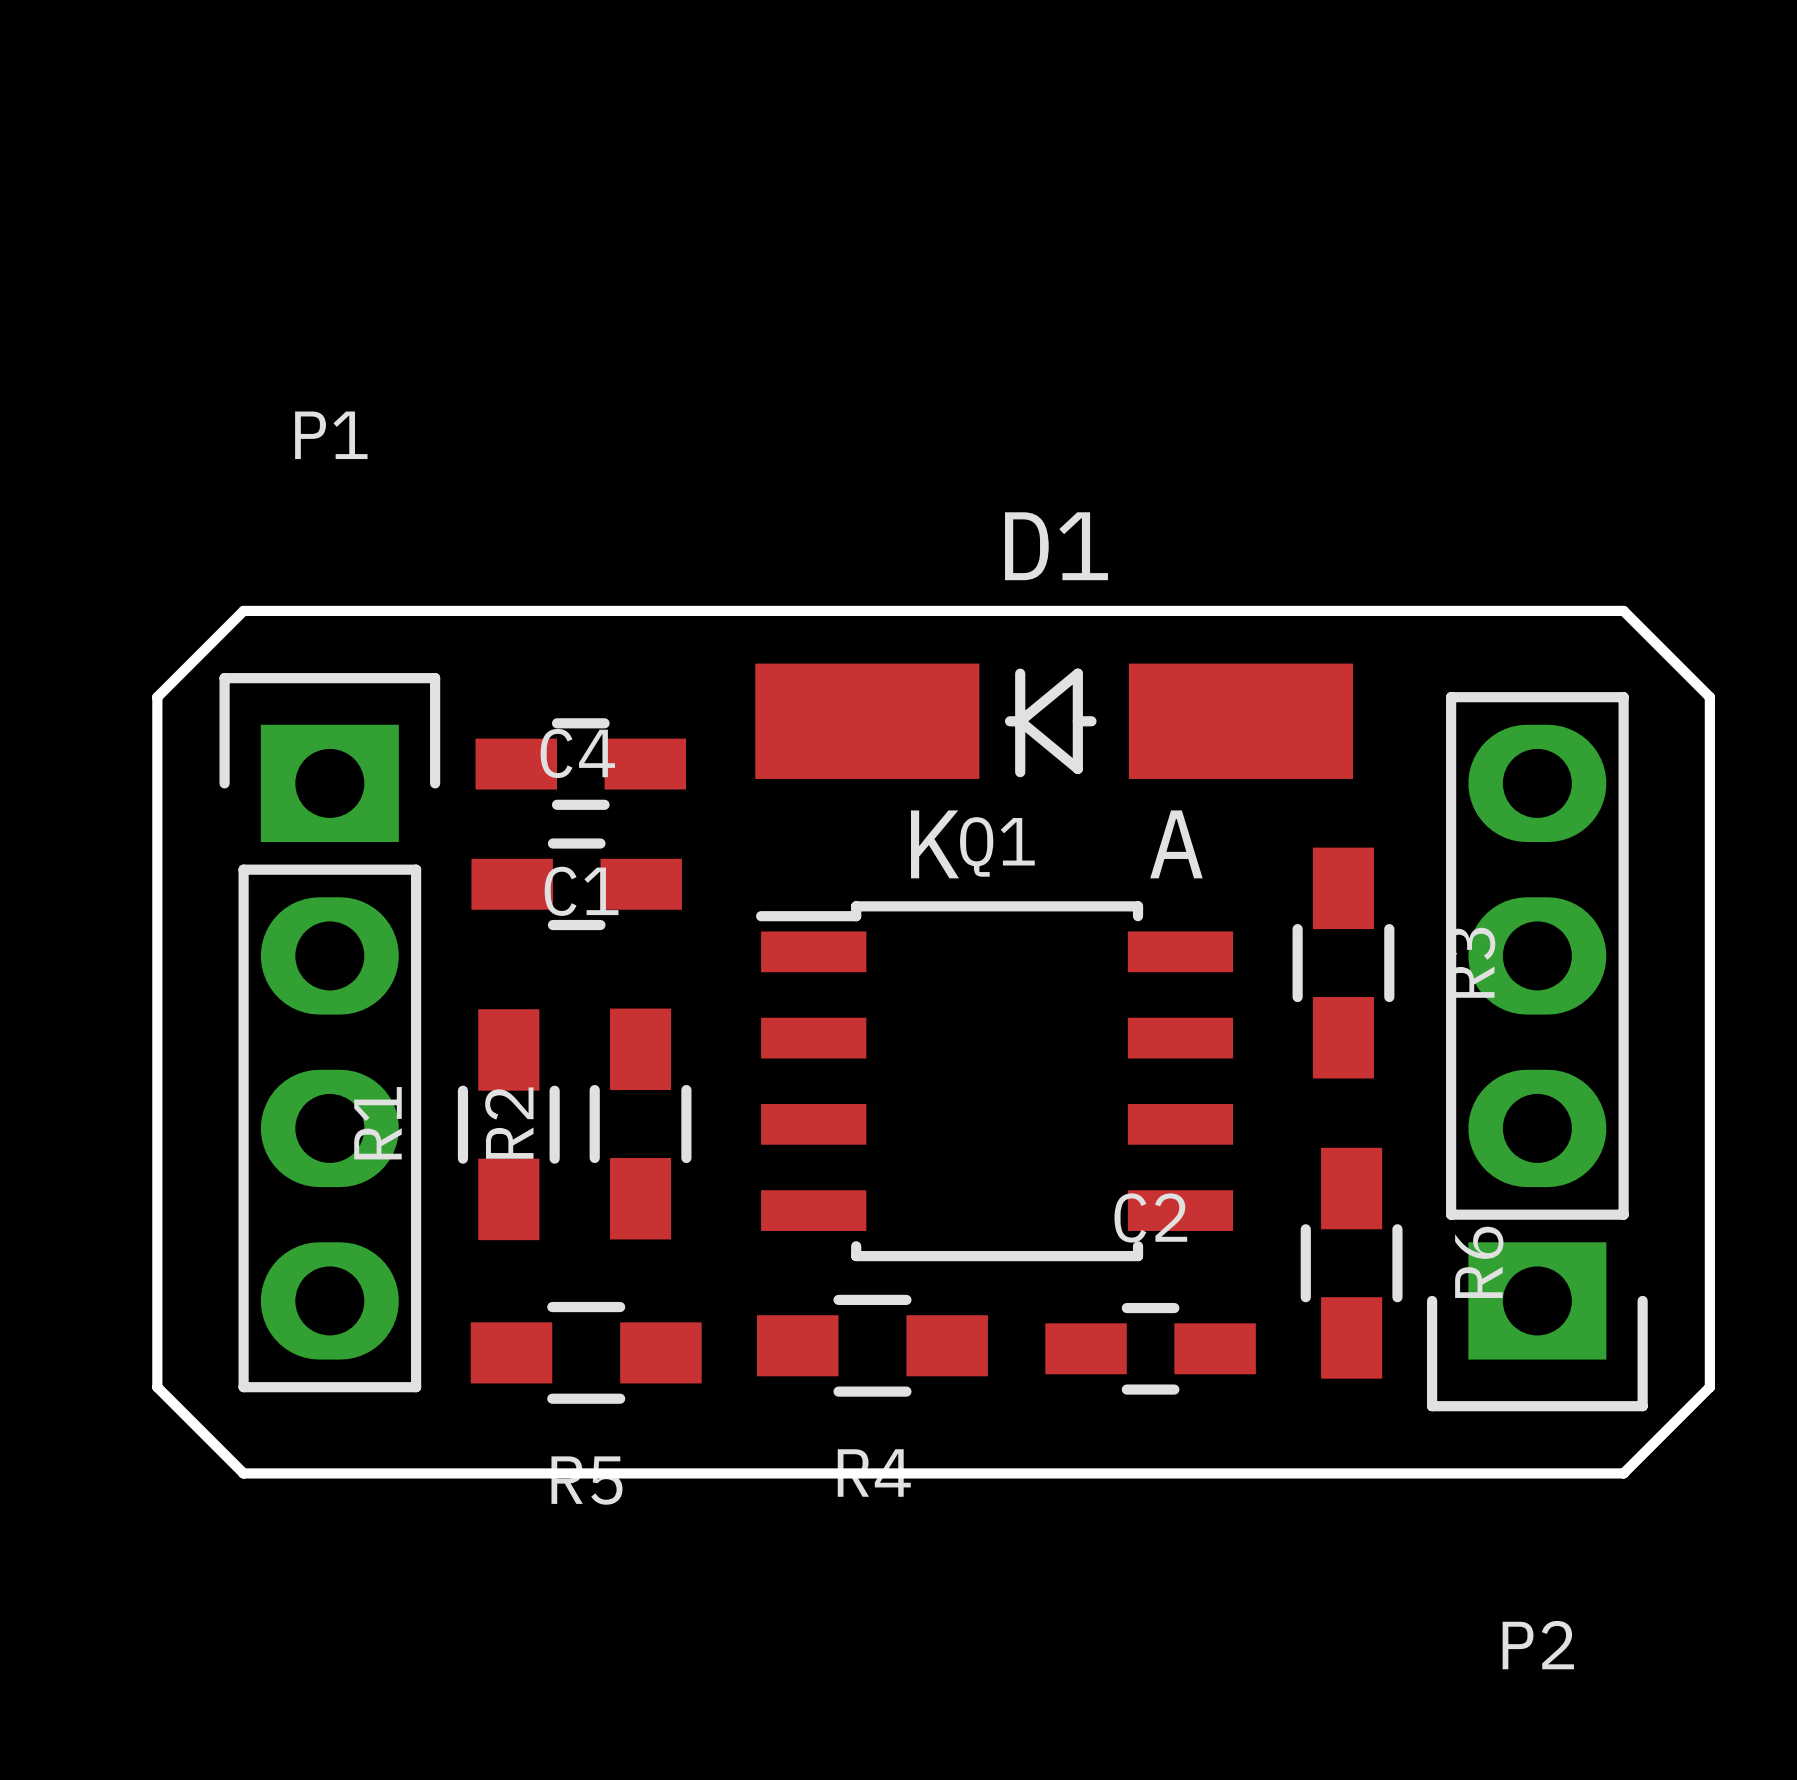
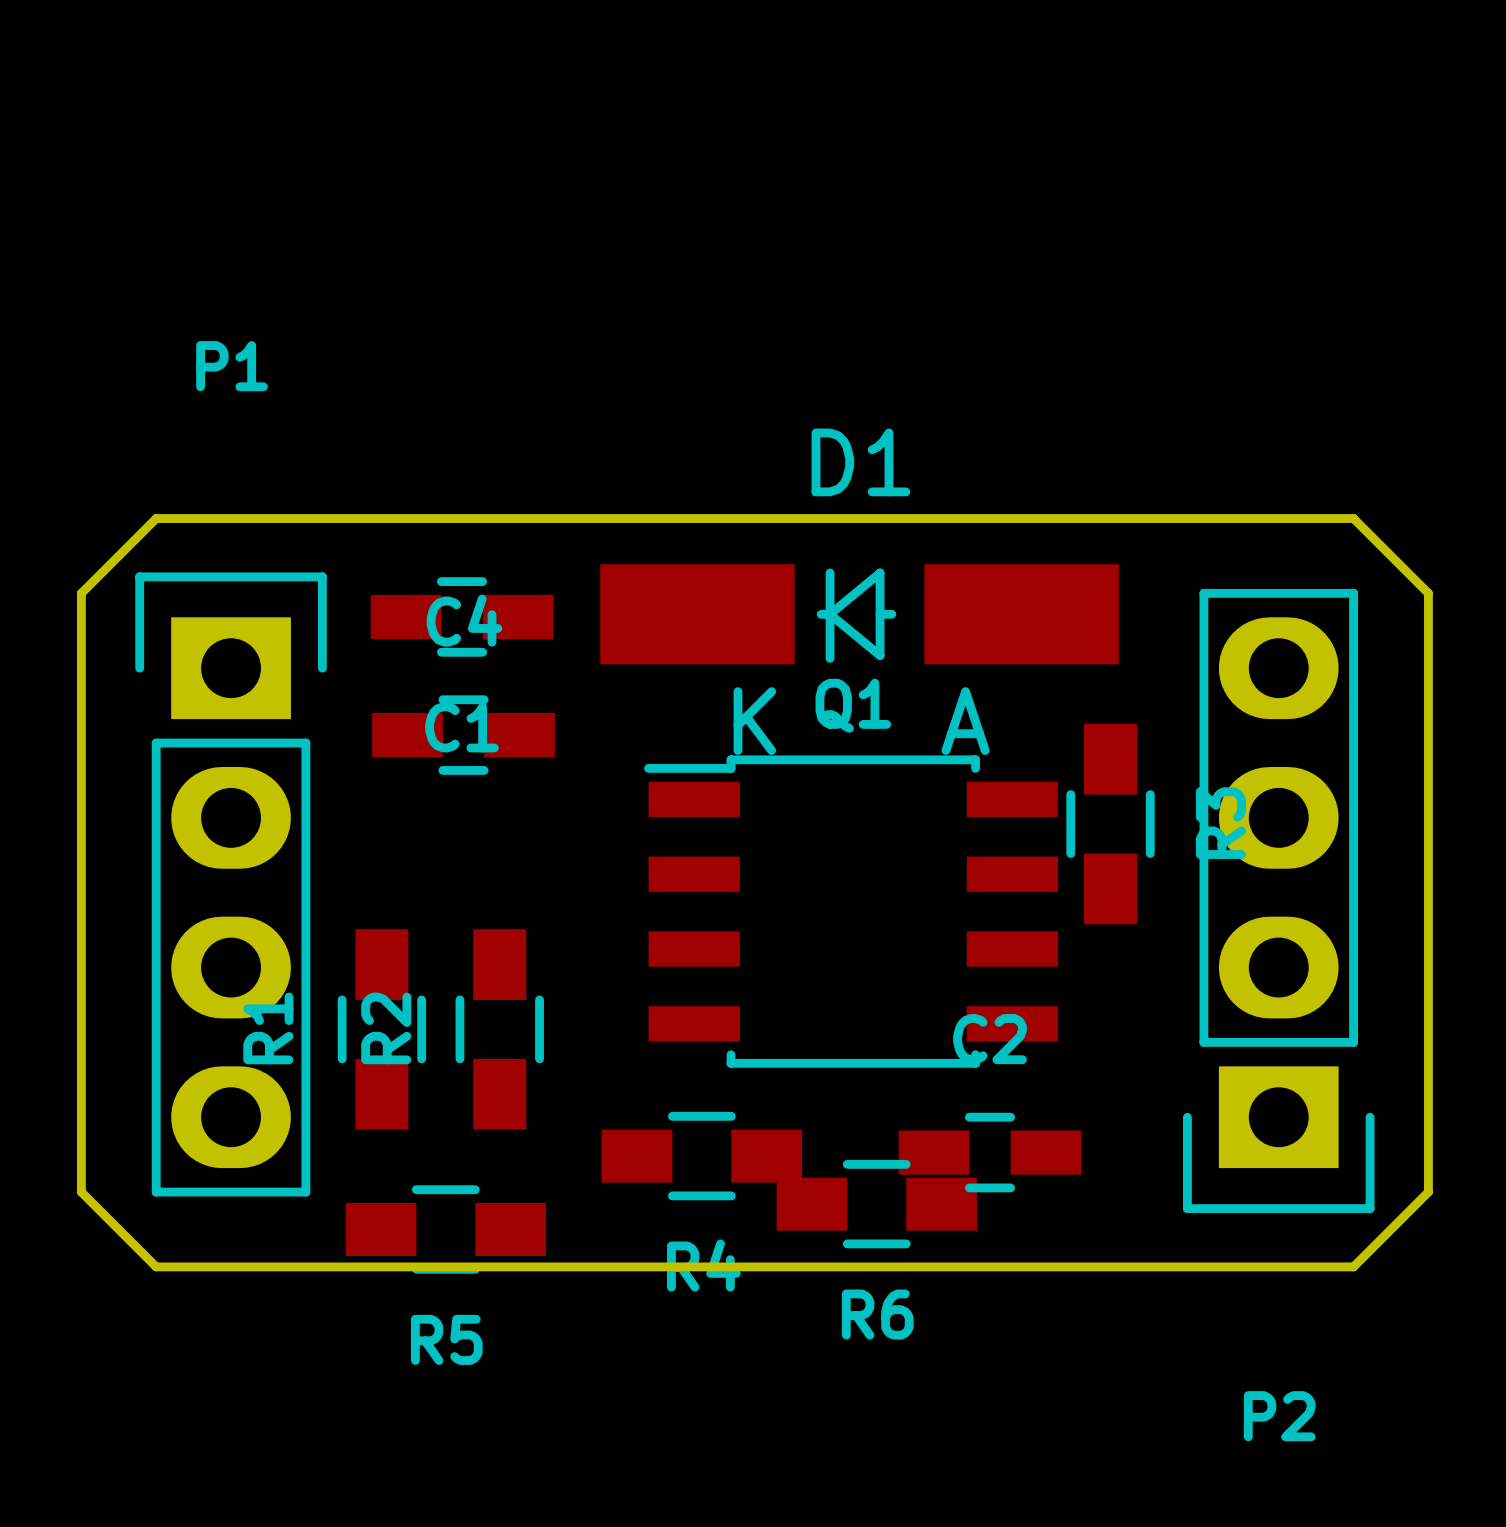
C1 position: (580, 764) -> (462, 616)
C4 position: (576, 884) -> (463, 735)
Q1 position: (994, 1081) -> (851, 911)
R1 position: (508, 1124) -> (381, 1029)
R2 position: (640, 1124) -> (499, 1029)
R6 rotation: 0° (1351, 1263) -> 90° clockwise (876, 1204)
R6 position: (1351, 1263) -> (876, 1204)
C2 position: (1150, 1348) -> (990, 1152)
R5 position: (586, 1352) -> (445, 1229)

